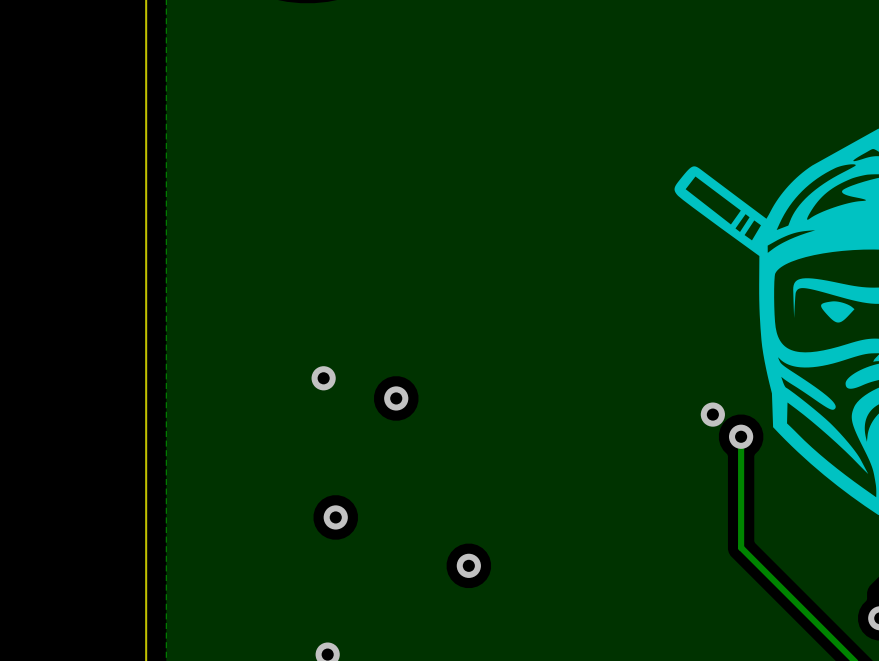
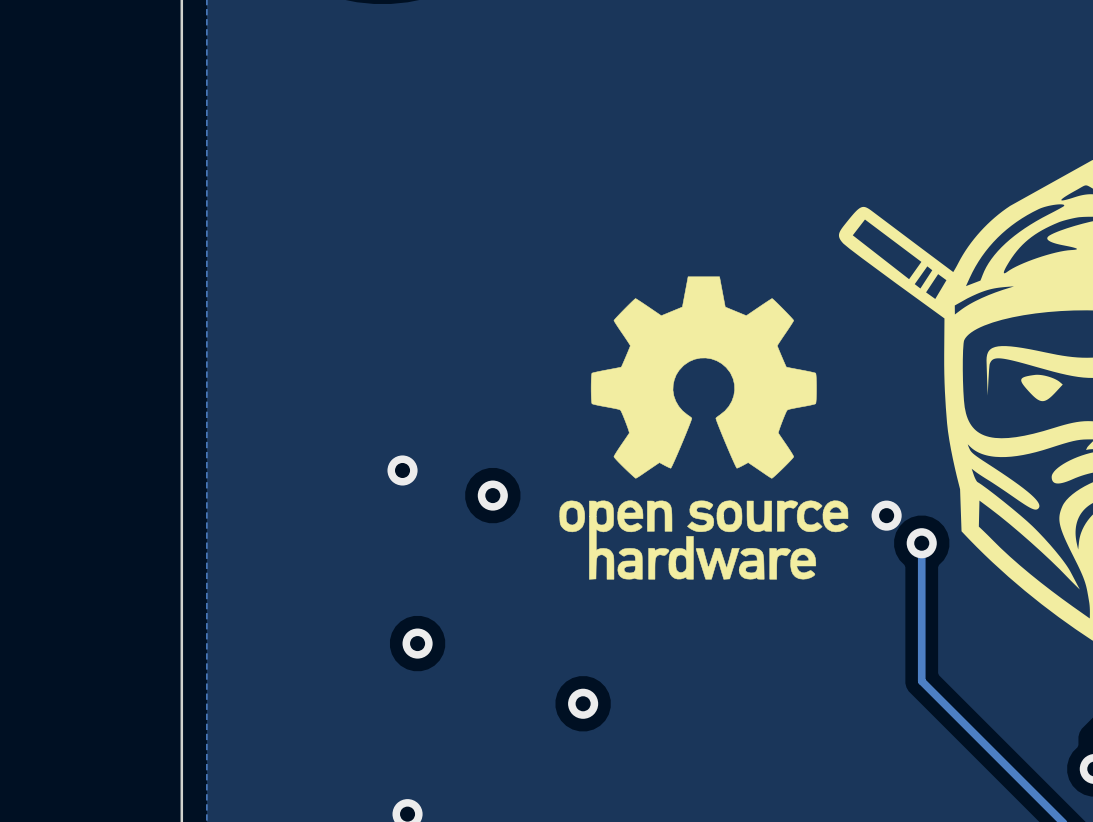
drawing: none -> [559, 276, 849, 580]

